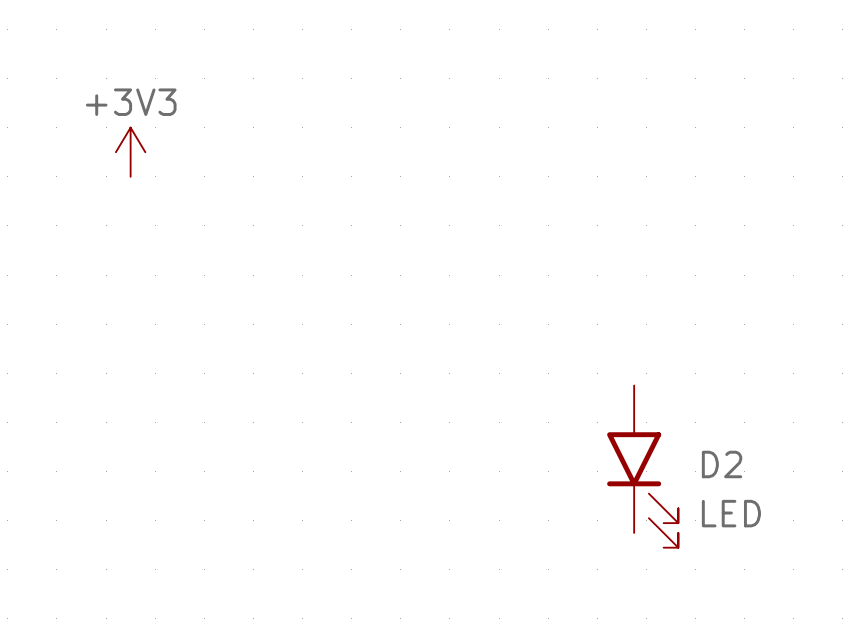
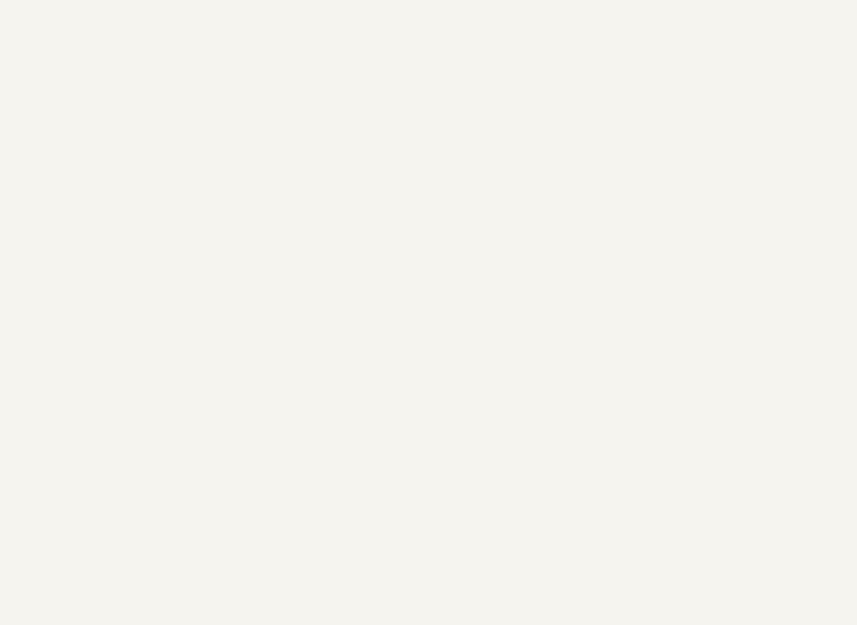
power symbol: +3V3 (130, 152) -> none
D2: LED (642, 466) -> none

